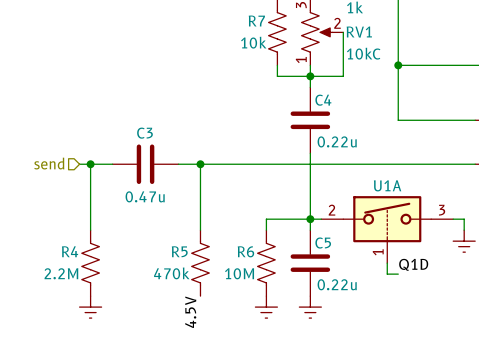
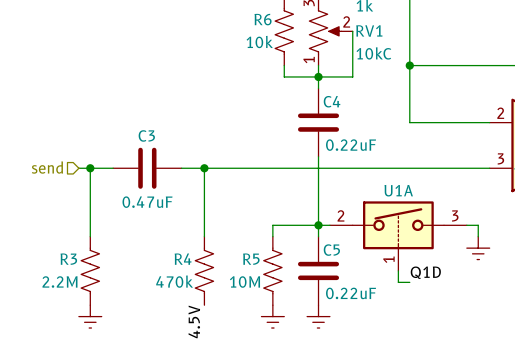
R7 name: R7 (256, 21) -> R6 (263, 19)
C4 value: 0.22u (337, 141) -> 0.22uF (351, 145)
C3 value: 0.47u (145, 196) -> 0.47uF (147, 202)
R4 name: R4 (70, 251) -> R3 (68, 259)
R5 name: R5 (179, 251) -> R4 (183, 259)
R6 name: R6 (245, 251) -> R5 (251, 259)
C5 value: 0.22u (337, 284) -> 0.22uF (351, 293)

